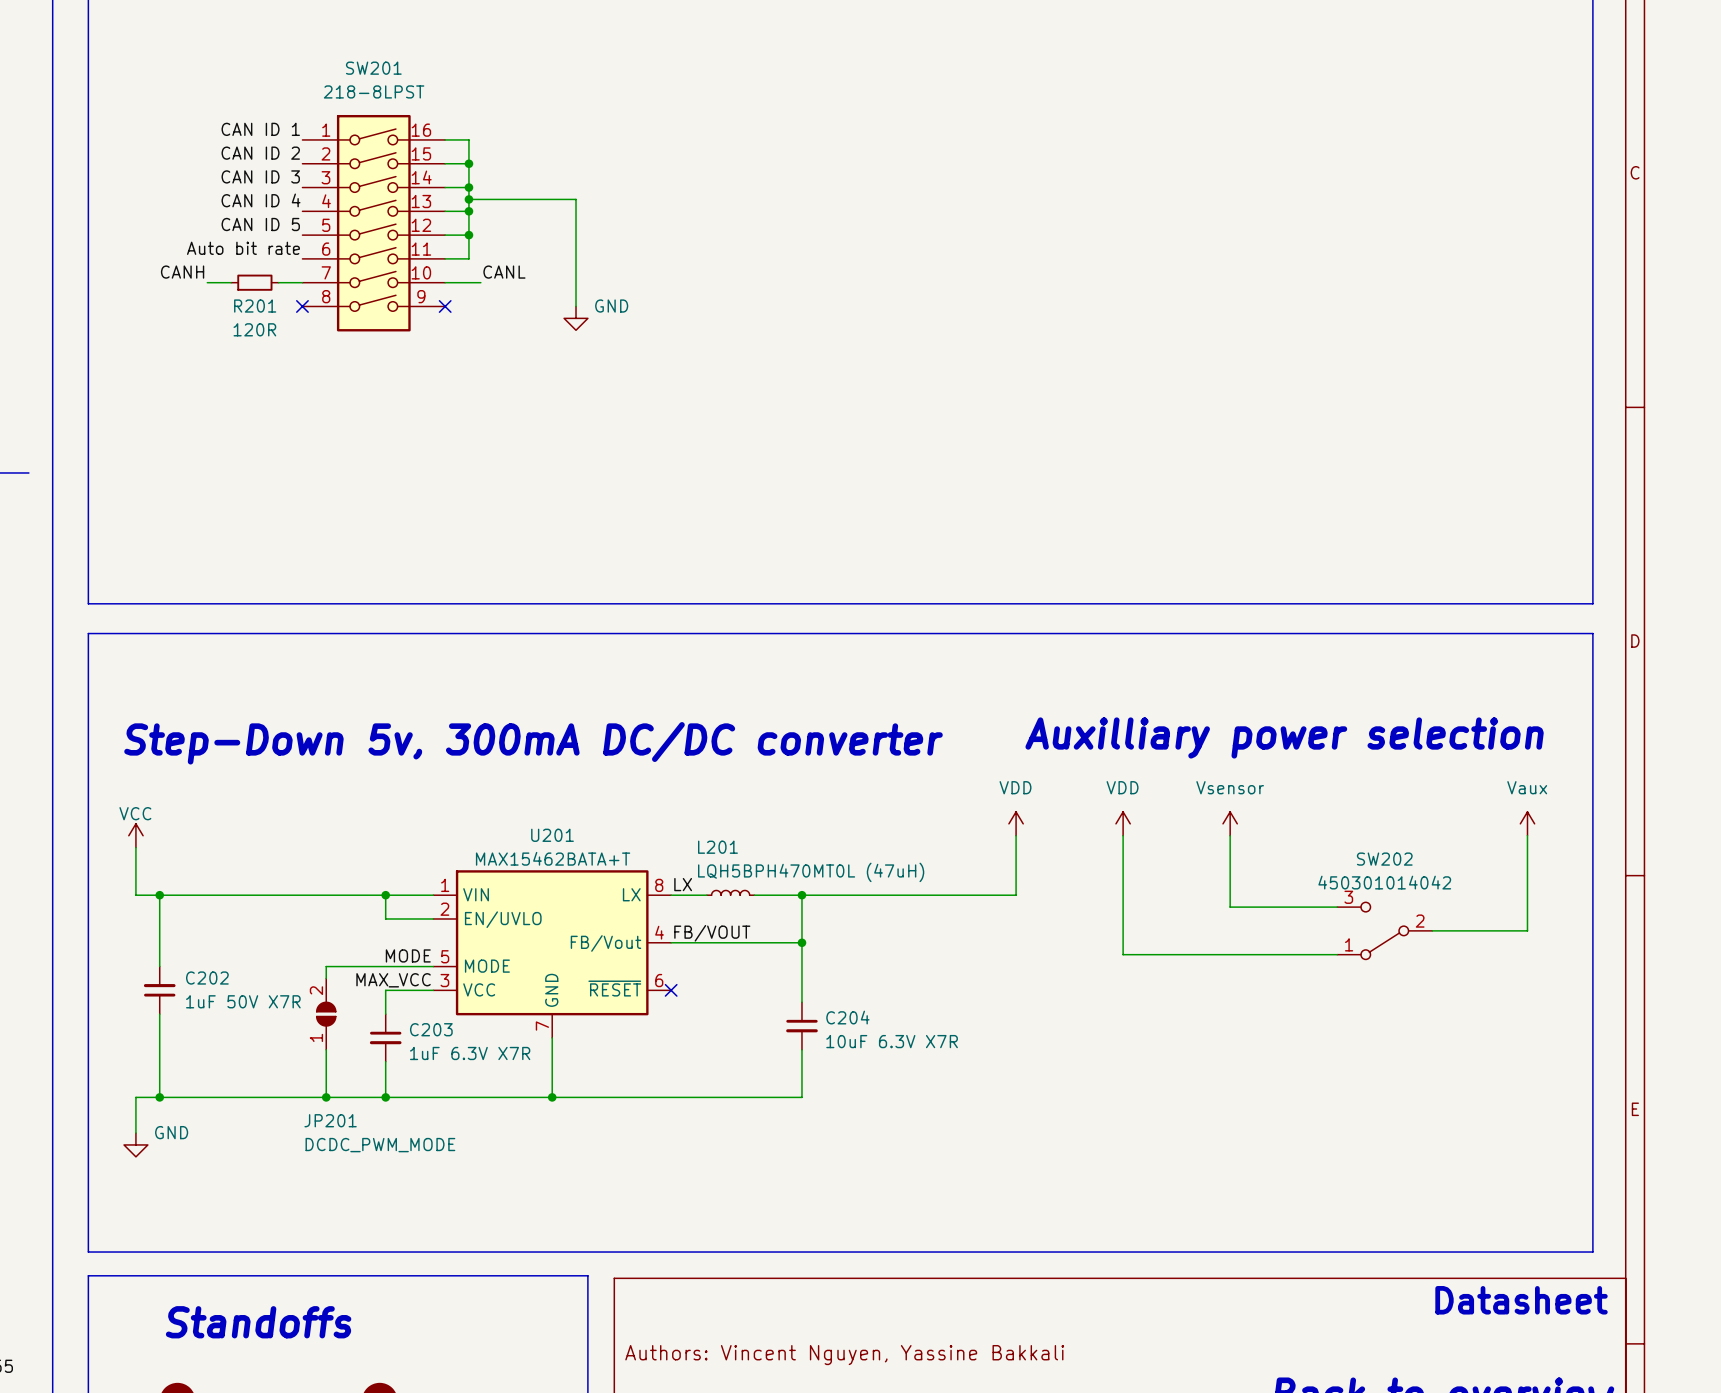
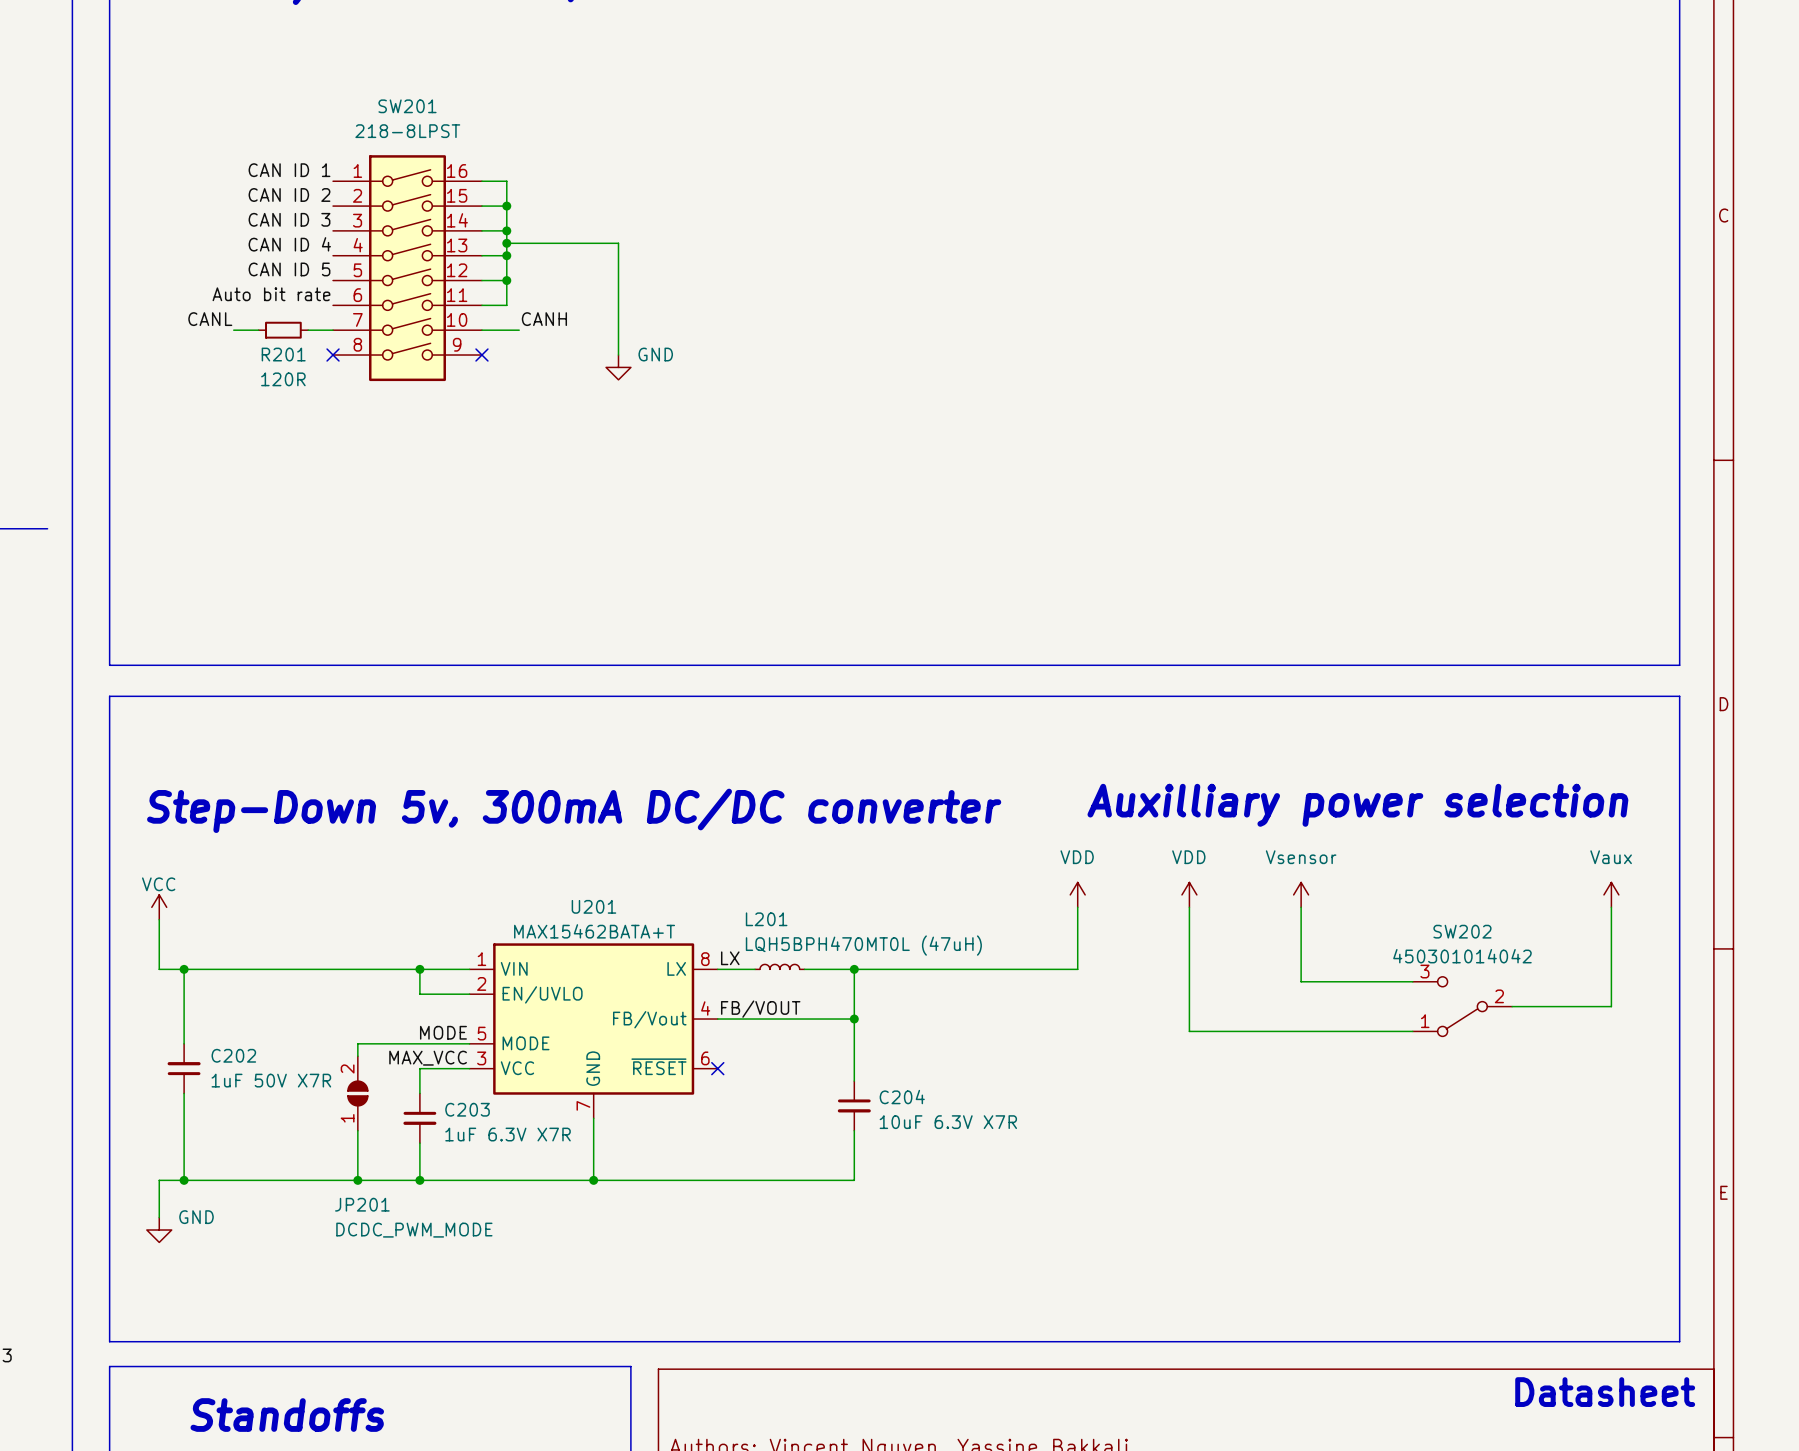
label: CANH (182, 272) -> CANL (210, 319)
label: CANL (504, 272) -> CANH (544, 319)

